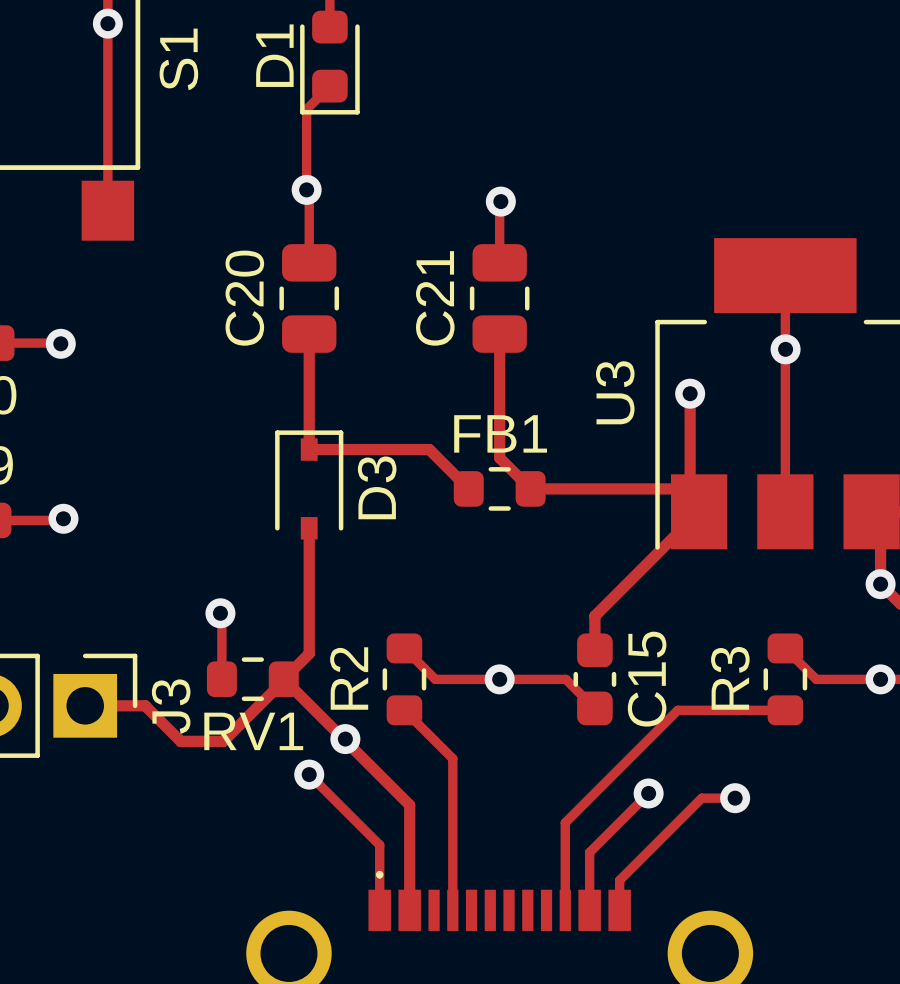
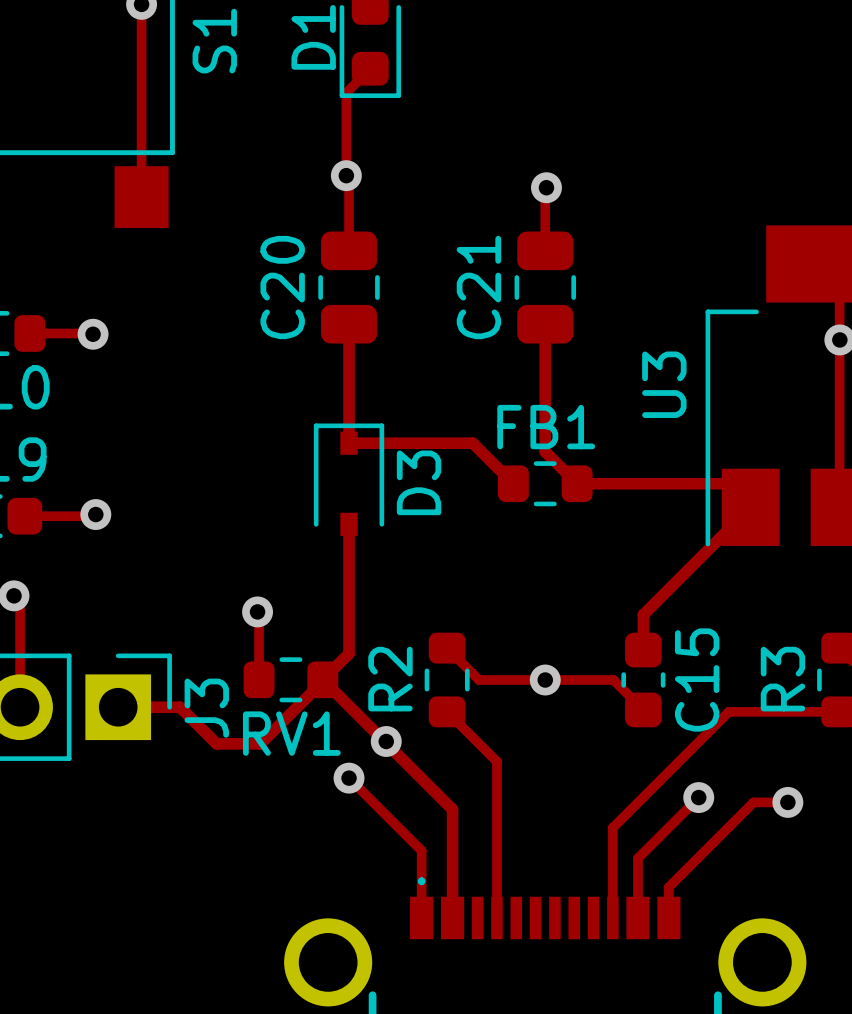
track: (690, 393) (690, 488) -> none
via: (690, 393) -> none

